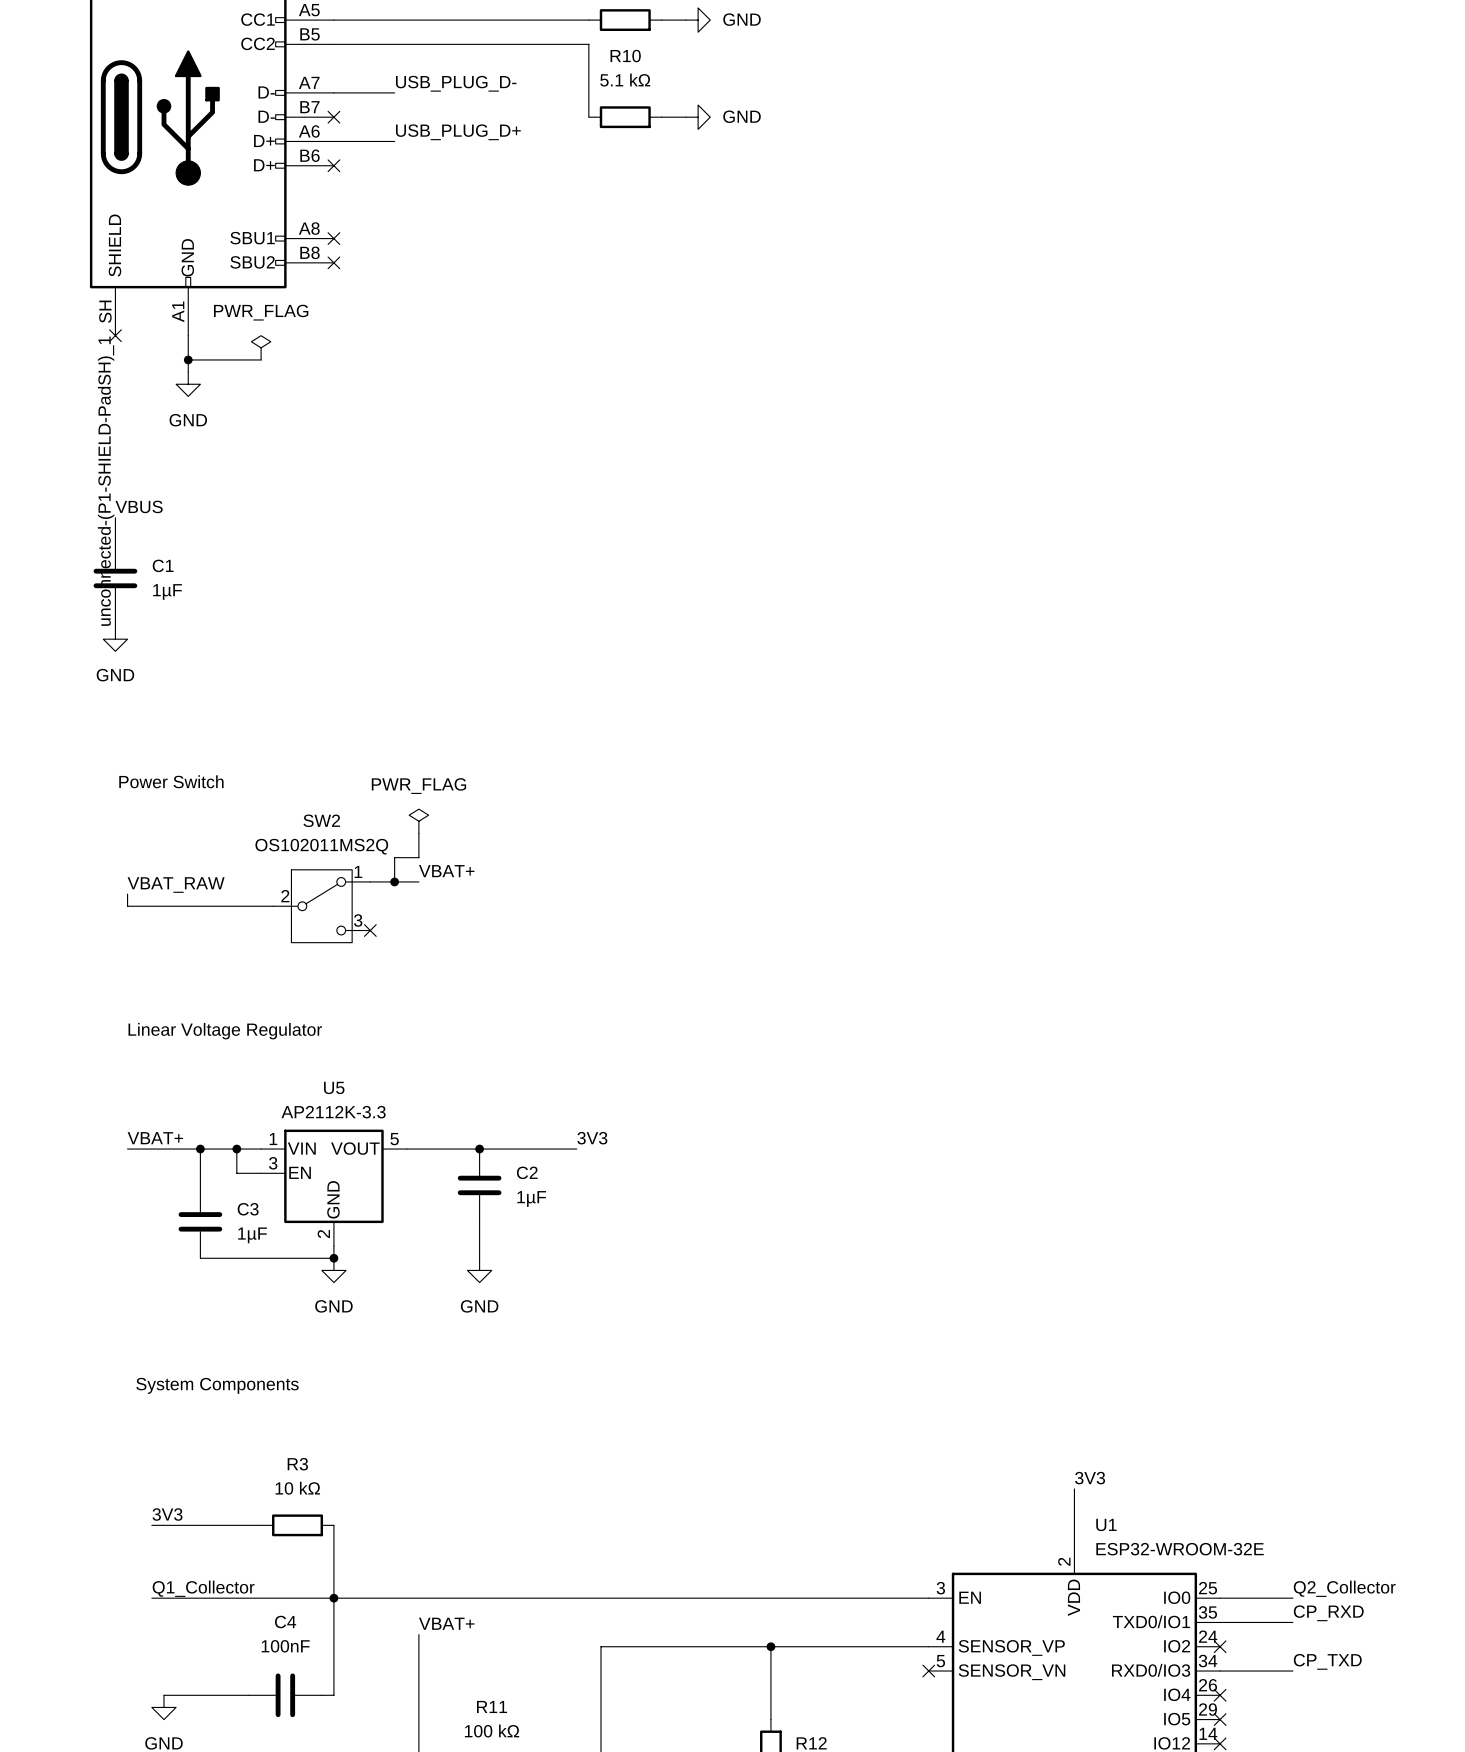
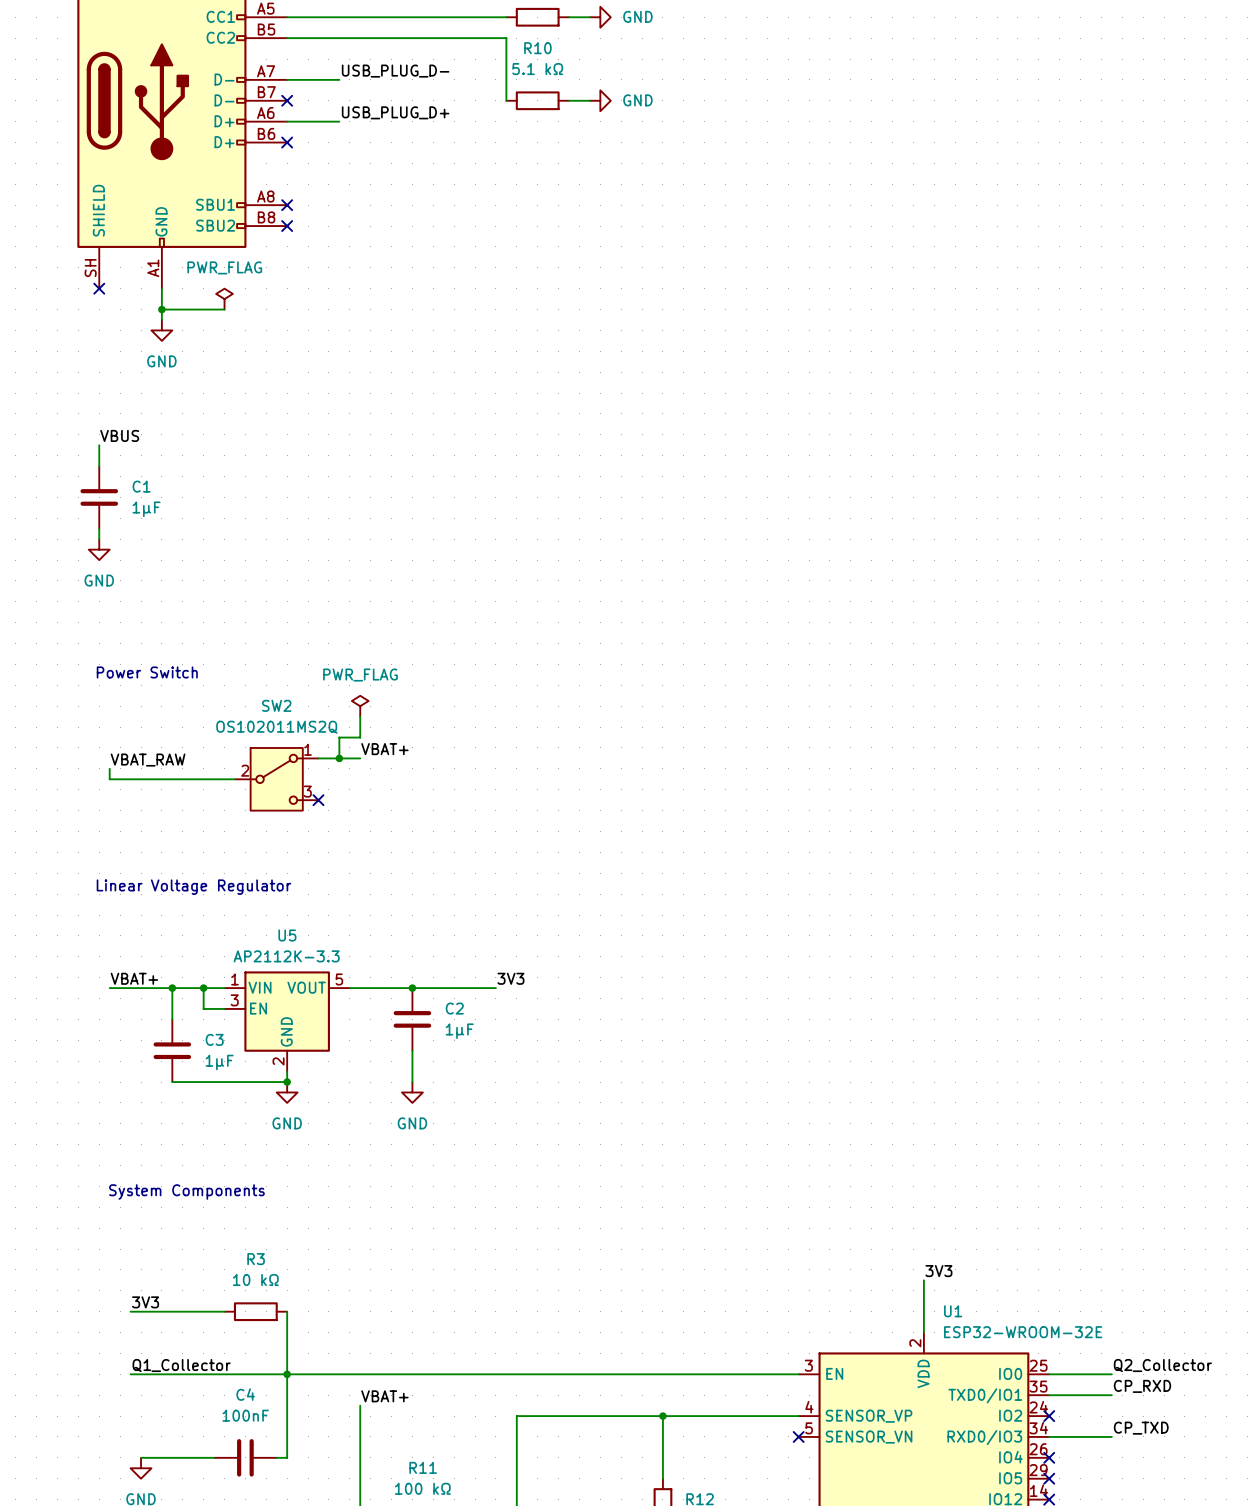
label: unconnected-(P1-SHIELD-PadSH)_1 (106, 481) -> none

